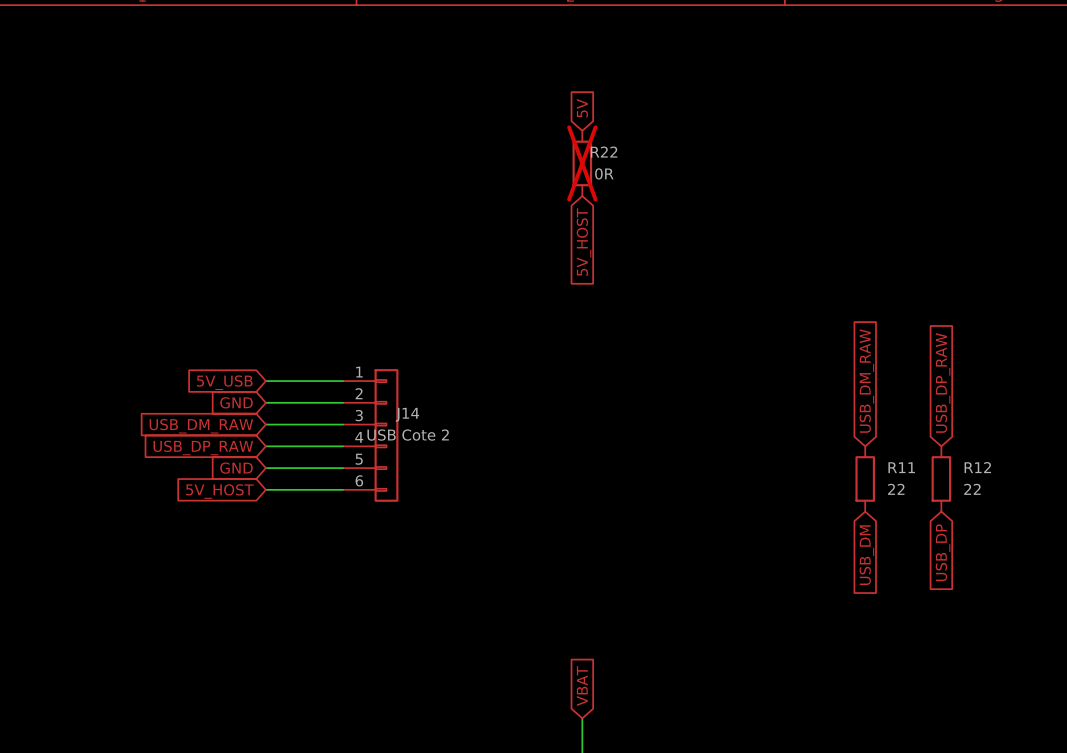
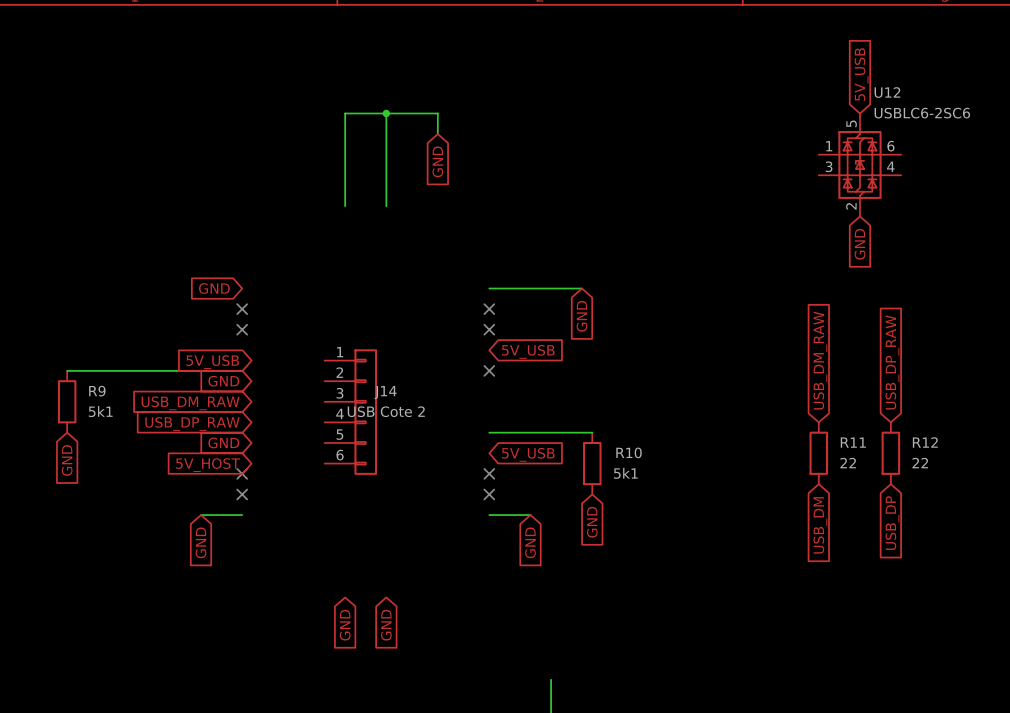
global label: none -> 5V_USB (861, 74)
global label: 5V (582, 108) -> none
wire: none -> (386, 113) (386, 206)
junction: none -> (386, 113)
wire: none -> (437, 134) (437, 113) (345, 113) (345, 206)
R22: 0R (582, 163) -> none
global label: none -> GND (437, 161)
U12: none -> USBLC6-2SC6 (859, 164)
global label: 5V_HOST (583, 242) -> none
global label: none -> GND (859, 244)
global label: none -> GND (214, 288)
wire: none -> (489, 288) (581, 288)
no-connect mark: none -> (242, 309)
no-connect mark: none -> (489, 309)
global label: none -> GND (581, 316)
no-connect mark: none -> (242, 329)
no-connect mark: none -> (489, 329)
global label: none -> 5V_USB (528, 351)
wire: (265, 381) (342, 381) -> none
wire: none -> (67, 370) (242, 370)
no-connect mark: none -> (489, 370)
wire: (265, 402) (342, 402) -> none
R9: none -> 5k1 (67, 401)
wire: (265, 424) (342, 424) -> none
wire: (265, 446) (342, 446) -> none
wire: none -> (489, 432) (592, 432)
wire: (265, 468) (342, 468) -> none
global label: none -> 5V_USB (528, 454)
global label: none -> GND (67, 460)
wire: (265, 489) (342, 489) -> none
R10: none -> 5k1 (592, 463)
no-connect mark: none -> (242, 473)
no-connect mark: none -> (489, 473)
no-connect mark: none -> (242, 494)
no-connect mark: none -> (489, 494)
wire: none -> (201, 515) (242, 515)
wire: none -> (489, 515) (530, 515)
global label: none -> GND (592, 522)
global label: none -> GND (201, 542)
global label: none -> GND (530, 542)
global label: none -> GND (345, 625)
global label: none -> GND (386, 625)
global label: VBAT (582, 686) -> none

